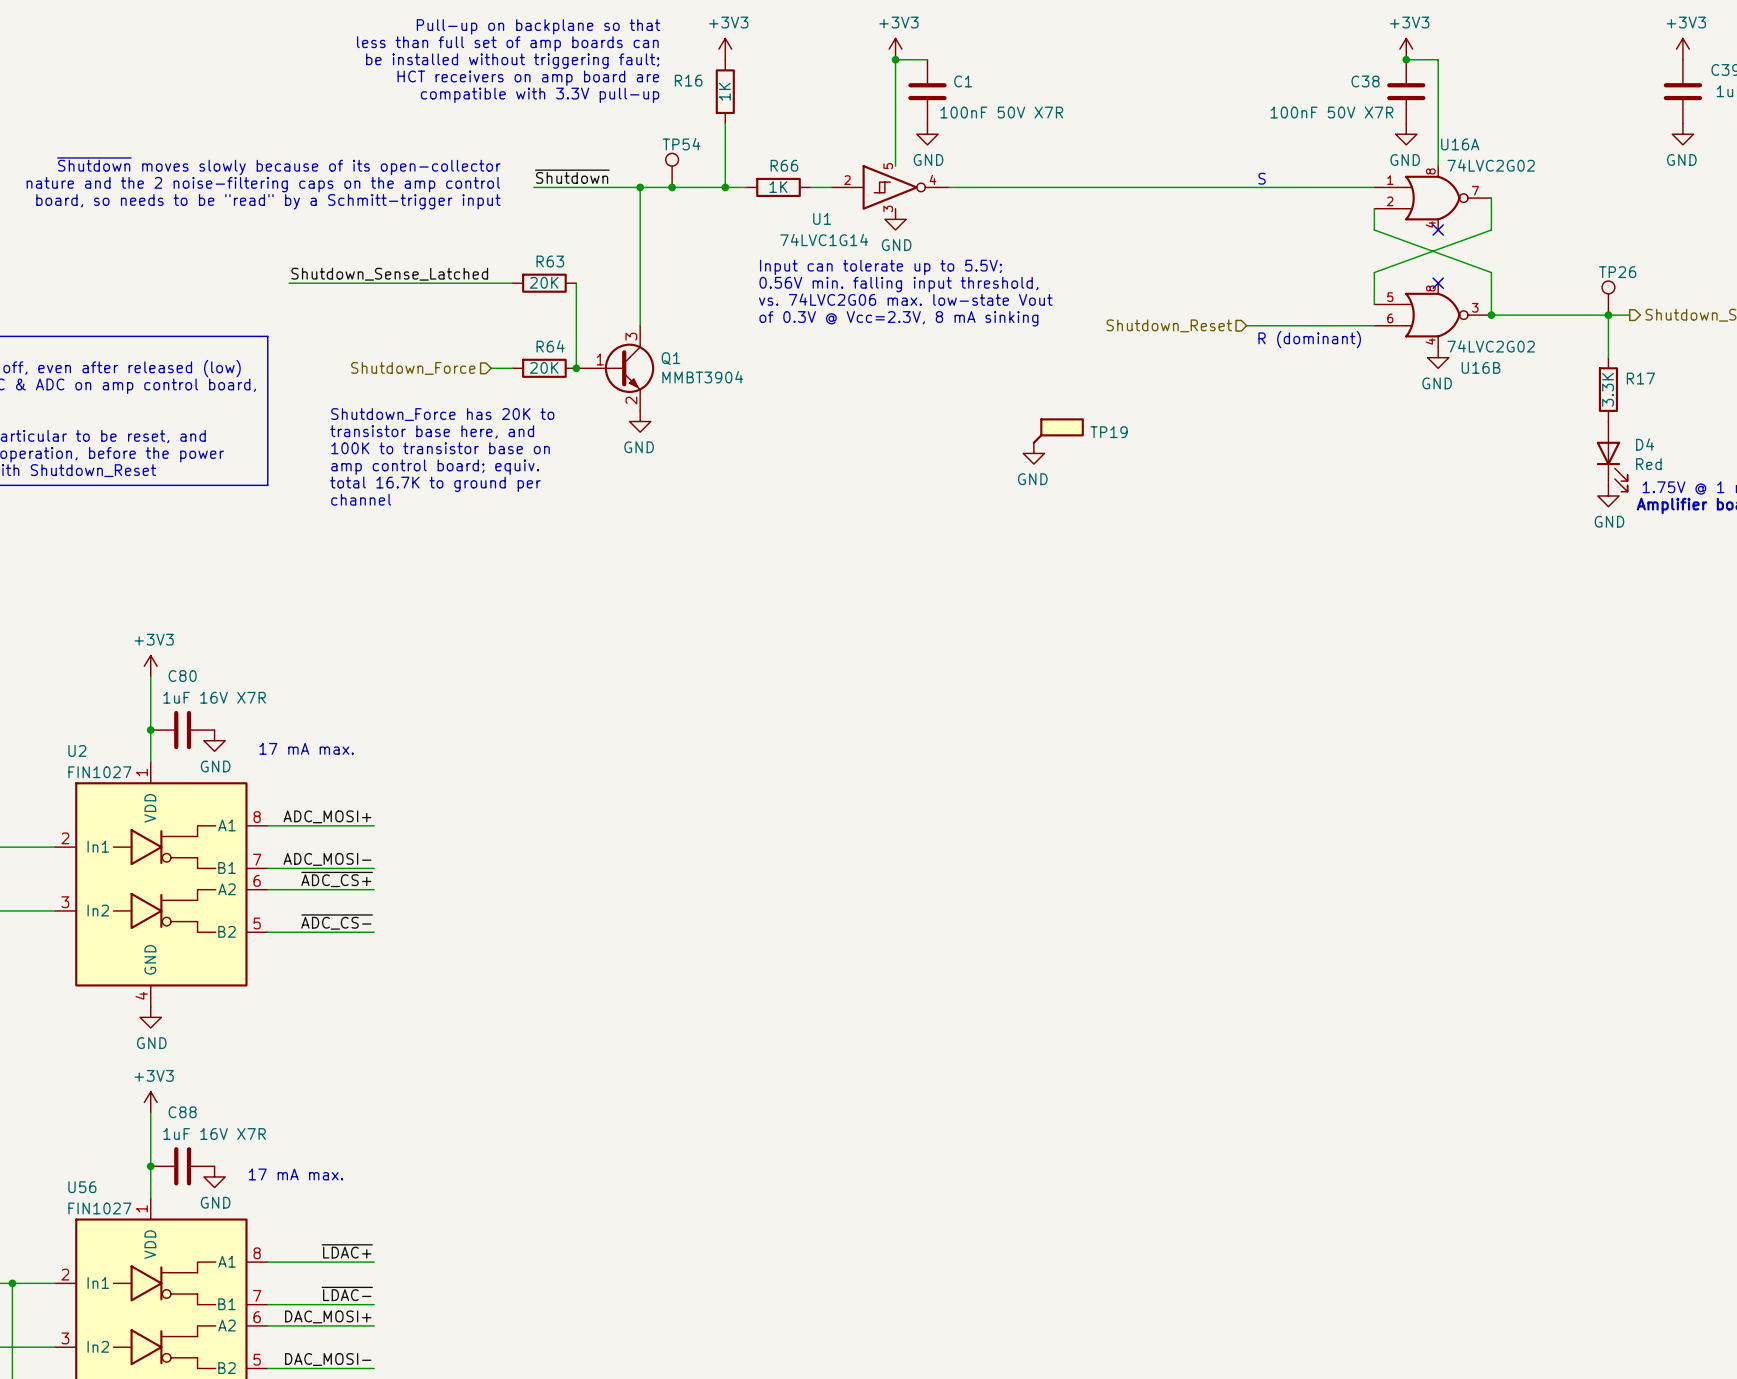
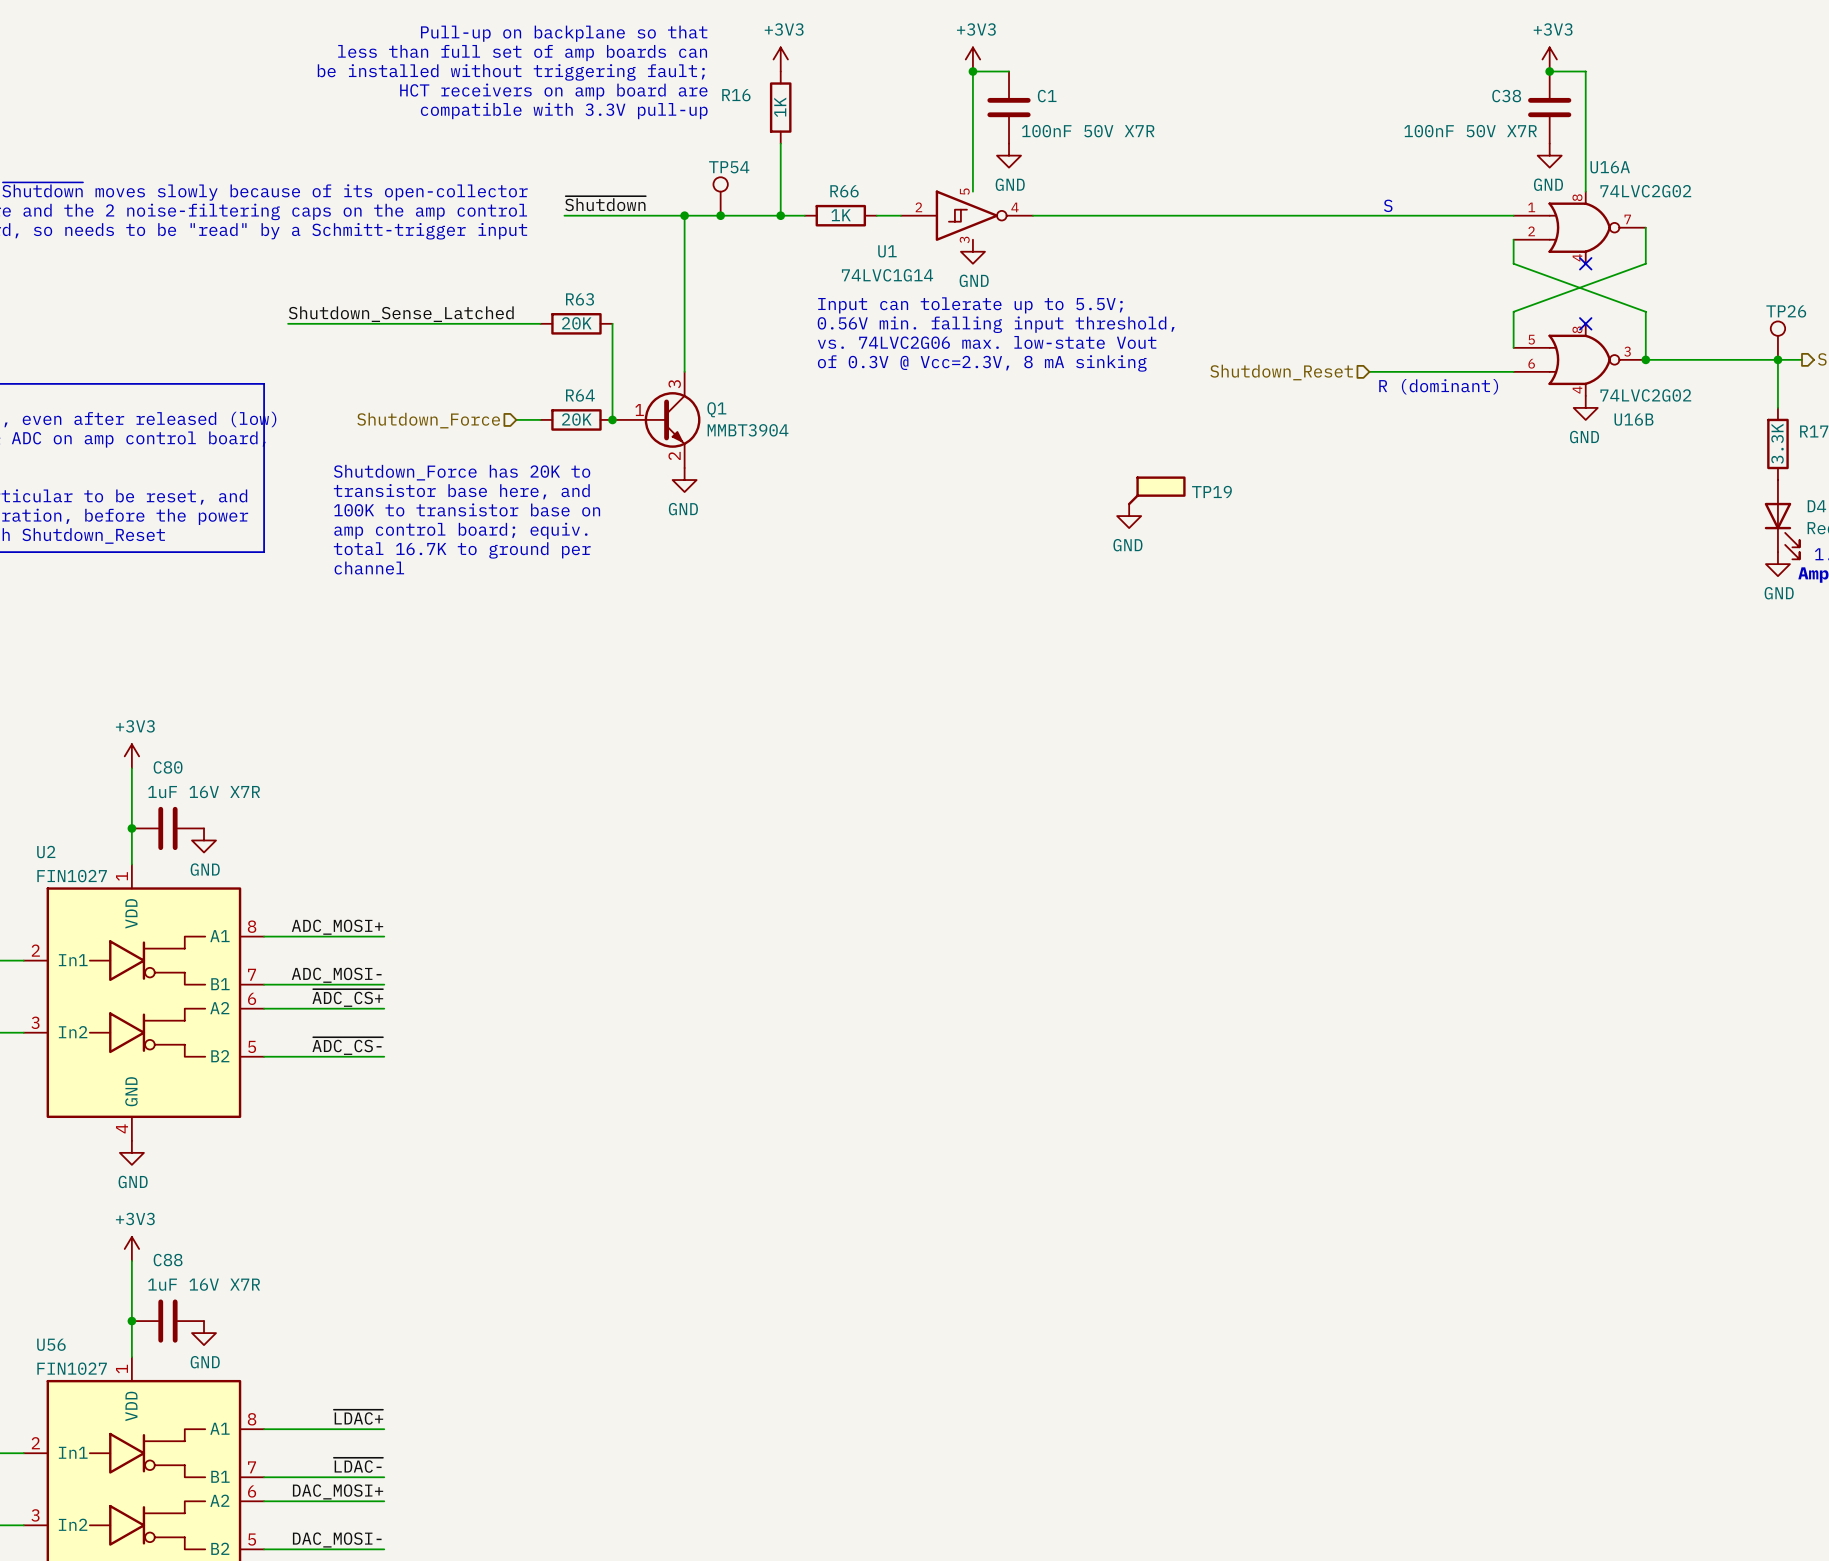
text: 17 mA max. (306, 748) -> none
text: 17 mA max. (295, 1174) -> none

